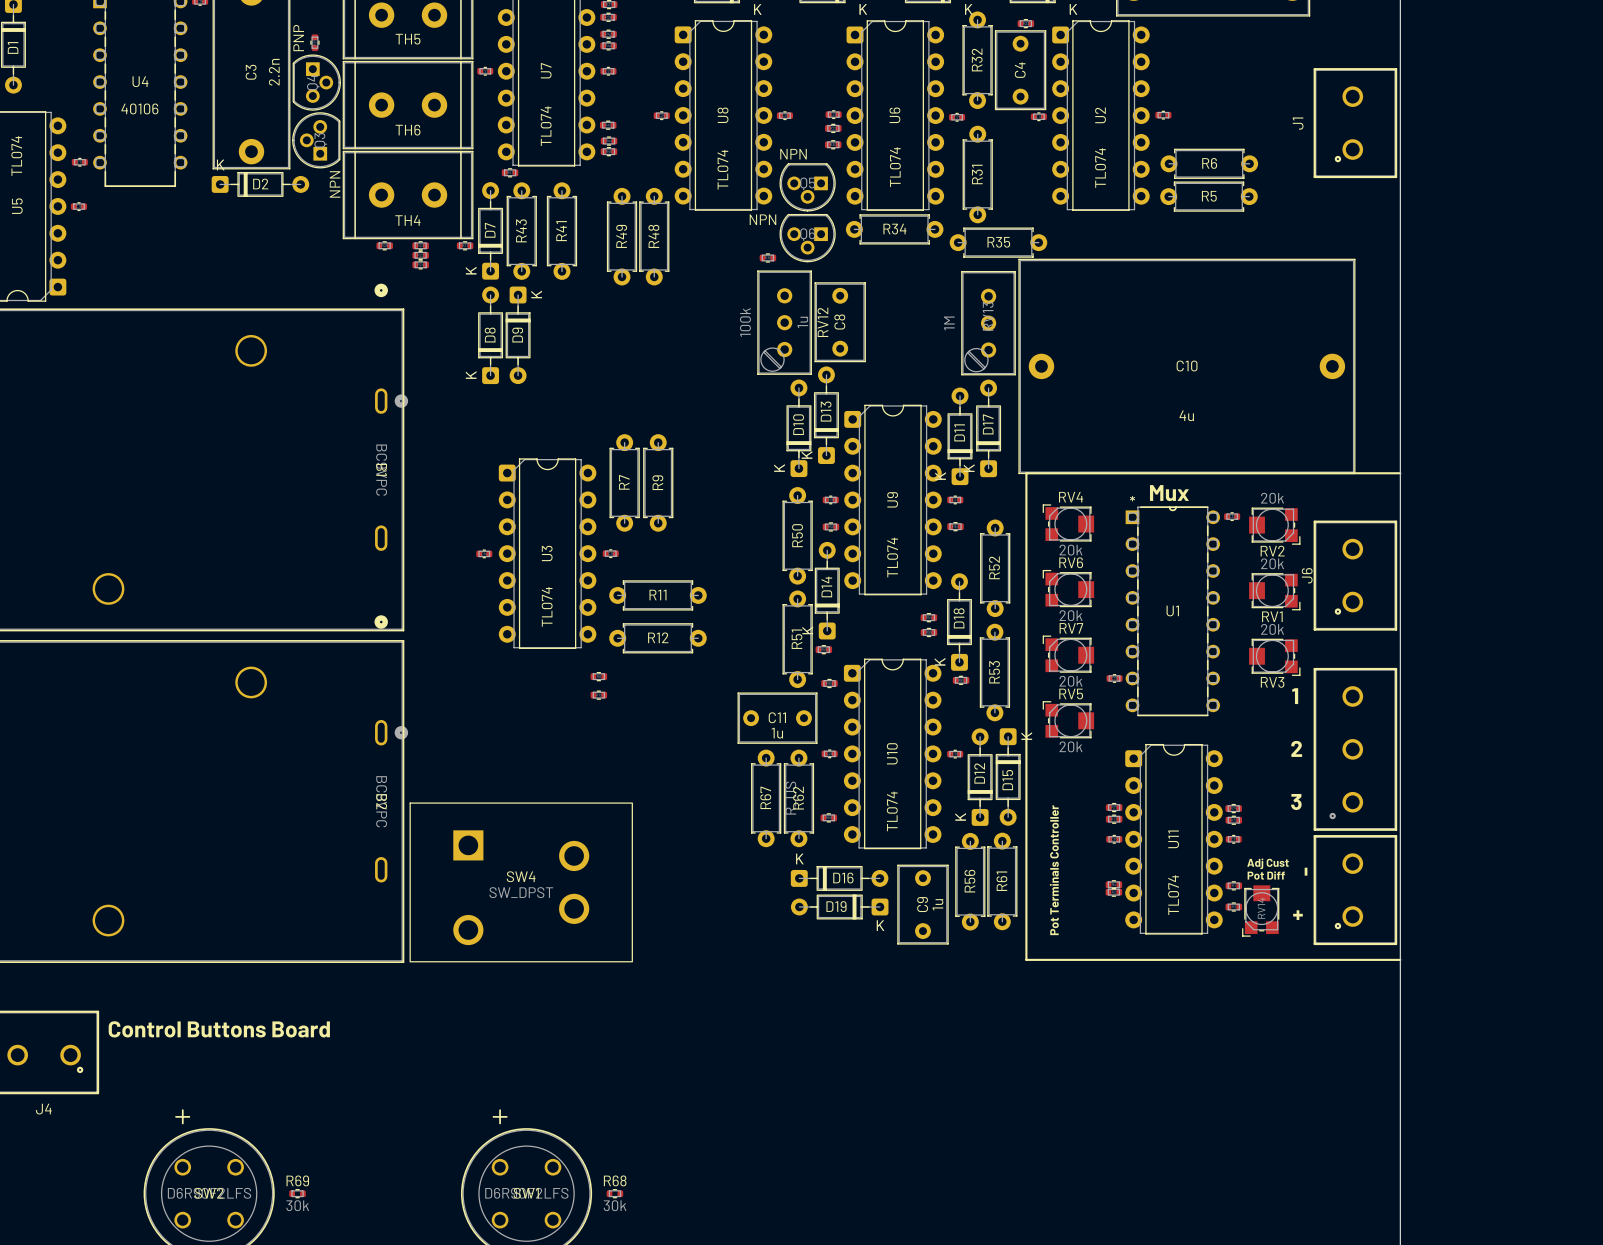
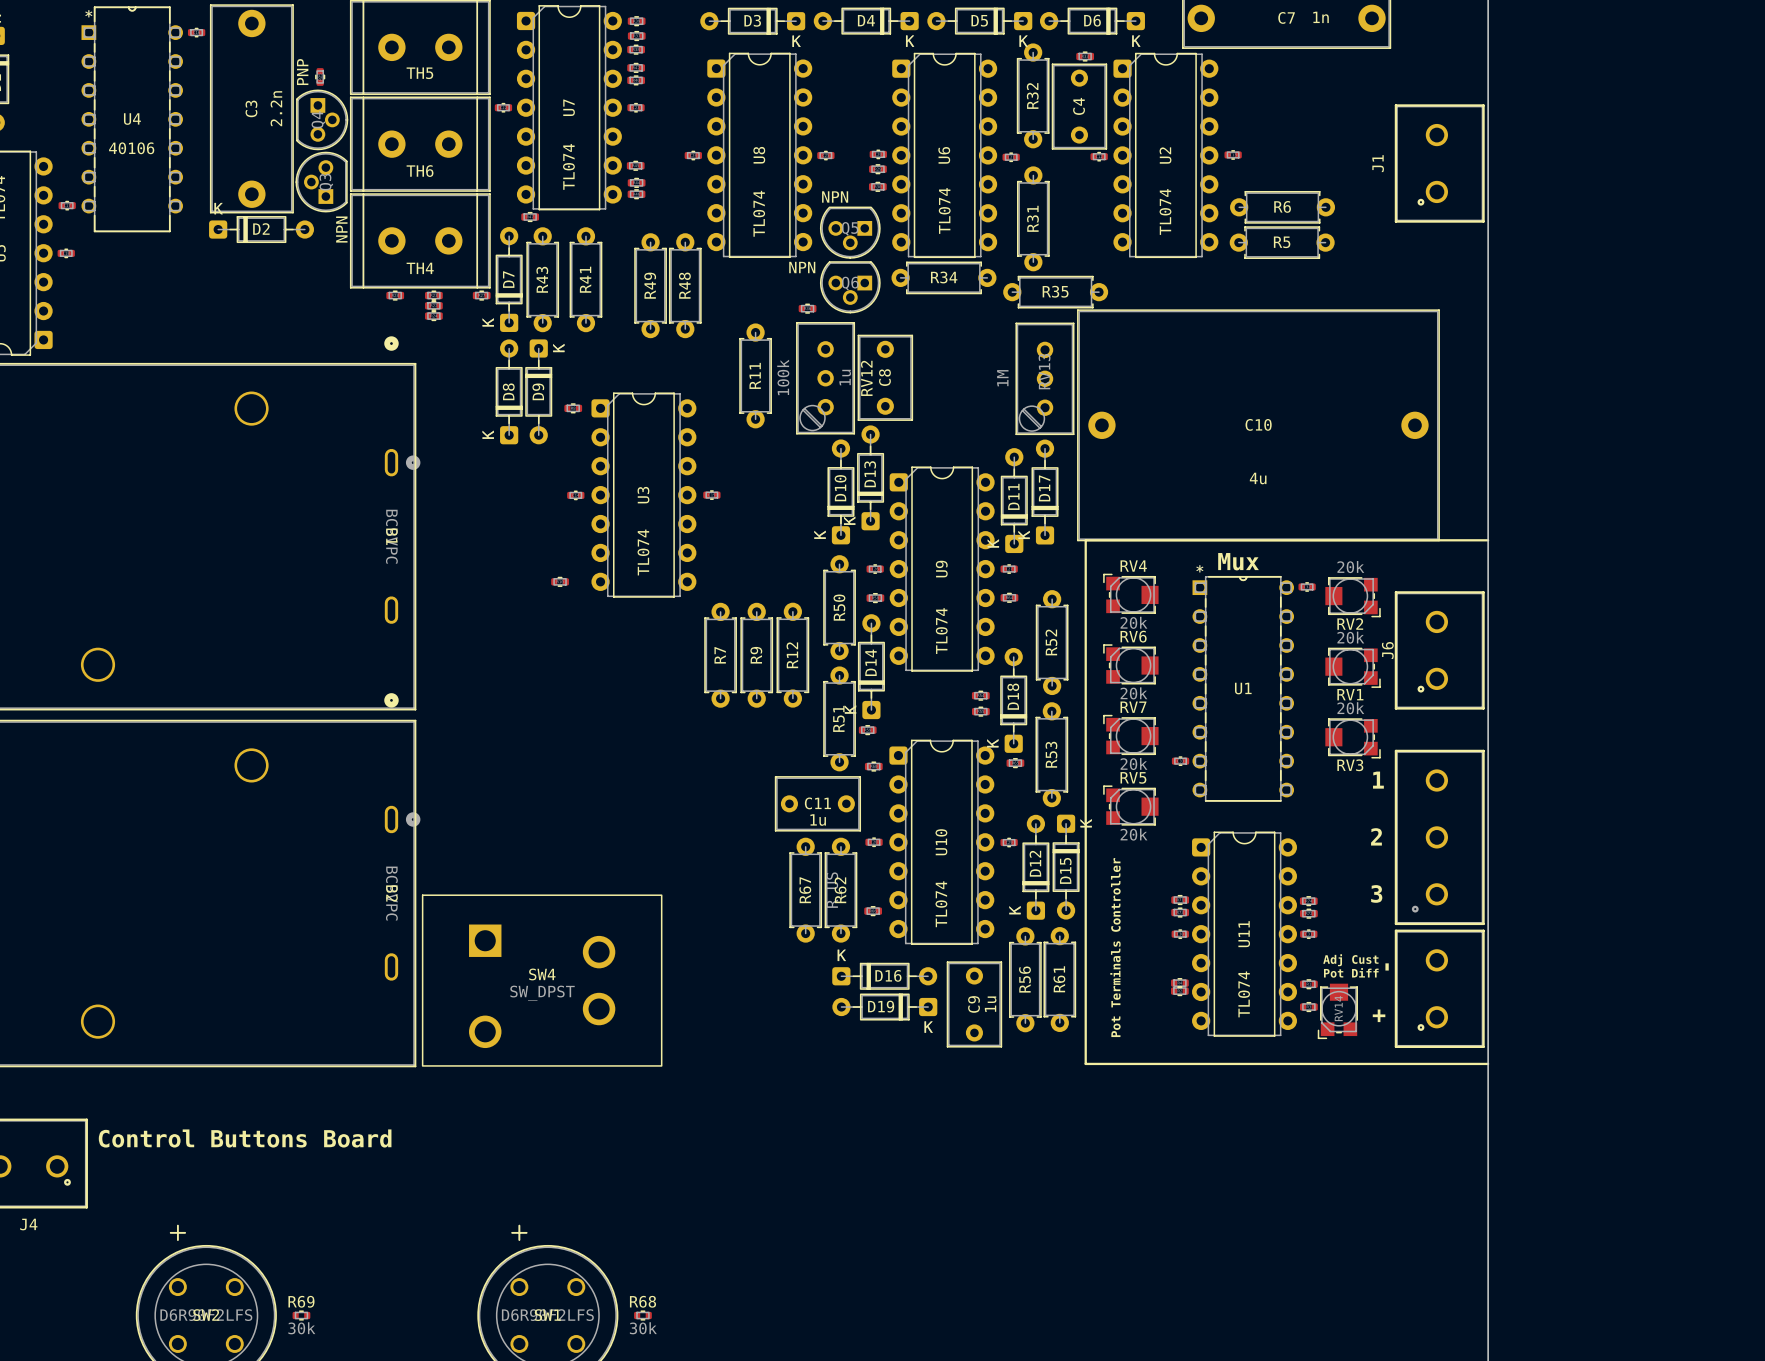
R7 position: (624, 482) -> (720, 655)
R9 position: (658, 482) -> (756, 655)
part position: (484, 553) -> (575, 495)
U3 position: (547, 553) -> (643, 495)
part position: (610, 553) -> (711, 495)
R11 rotation: 0° (657, 595) -> 90° clockwise (755, 375)
R11 position: (657, 595) -> (755, 375)
R12 rotation: 0° (657, 638) -> 90° clockwise (792, 655)
R12 position: (657, 638) -> (792, 655)
part position: (598, 676) -> (573, 408)
part position: (598, 695) -> (560, 581)

